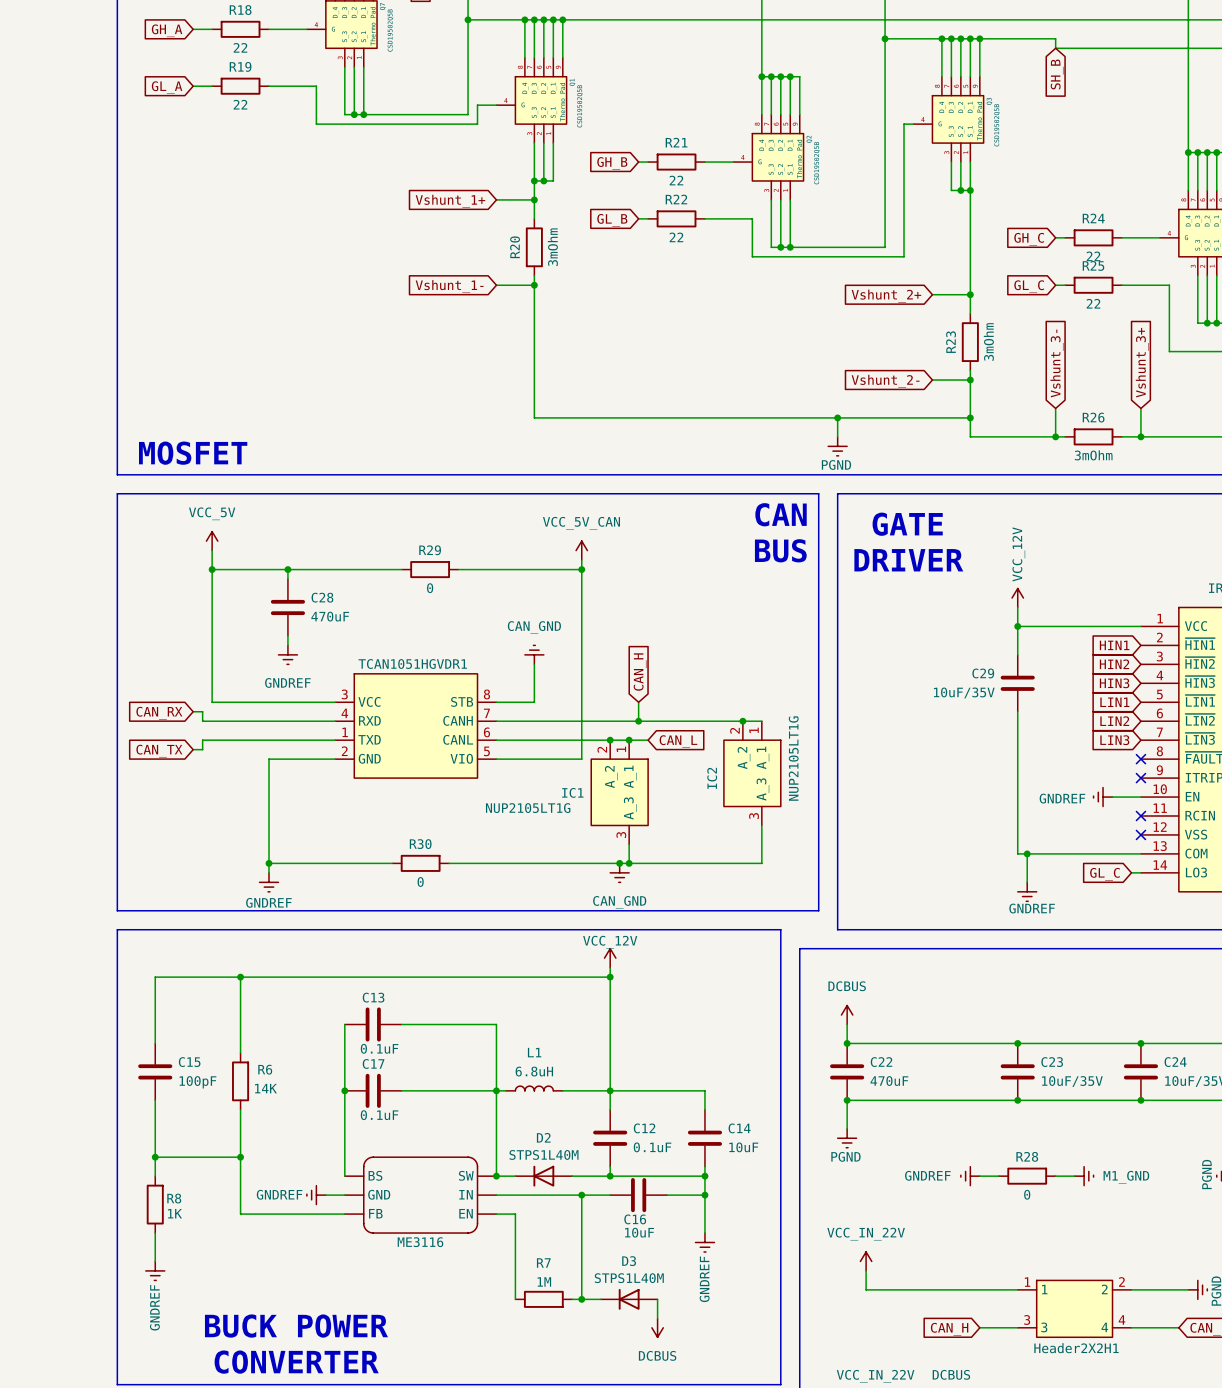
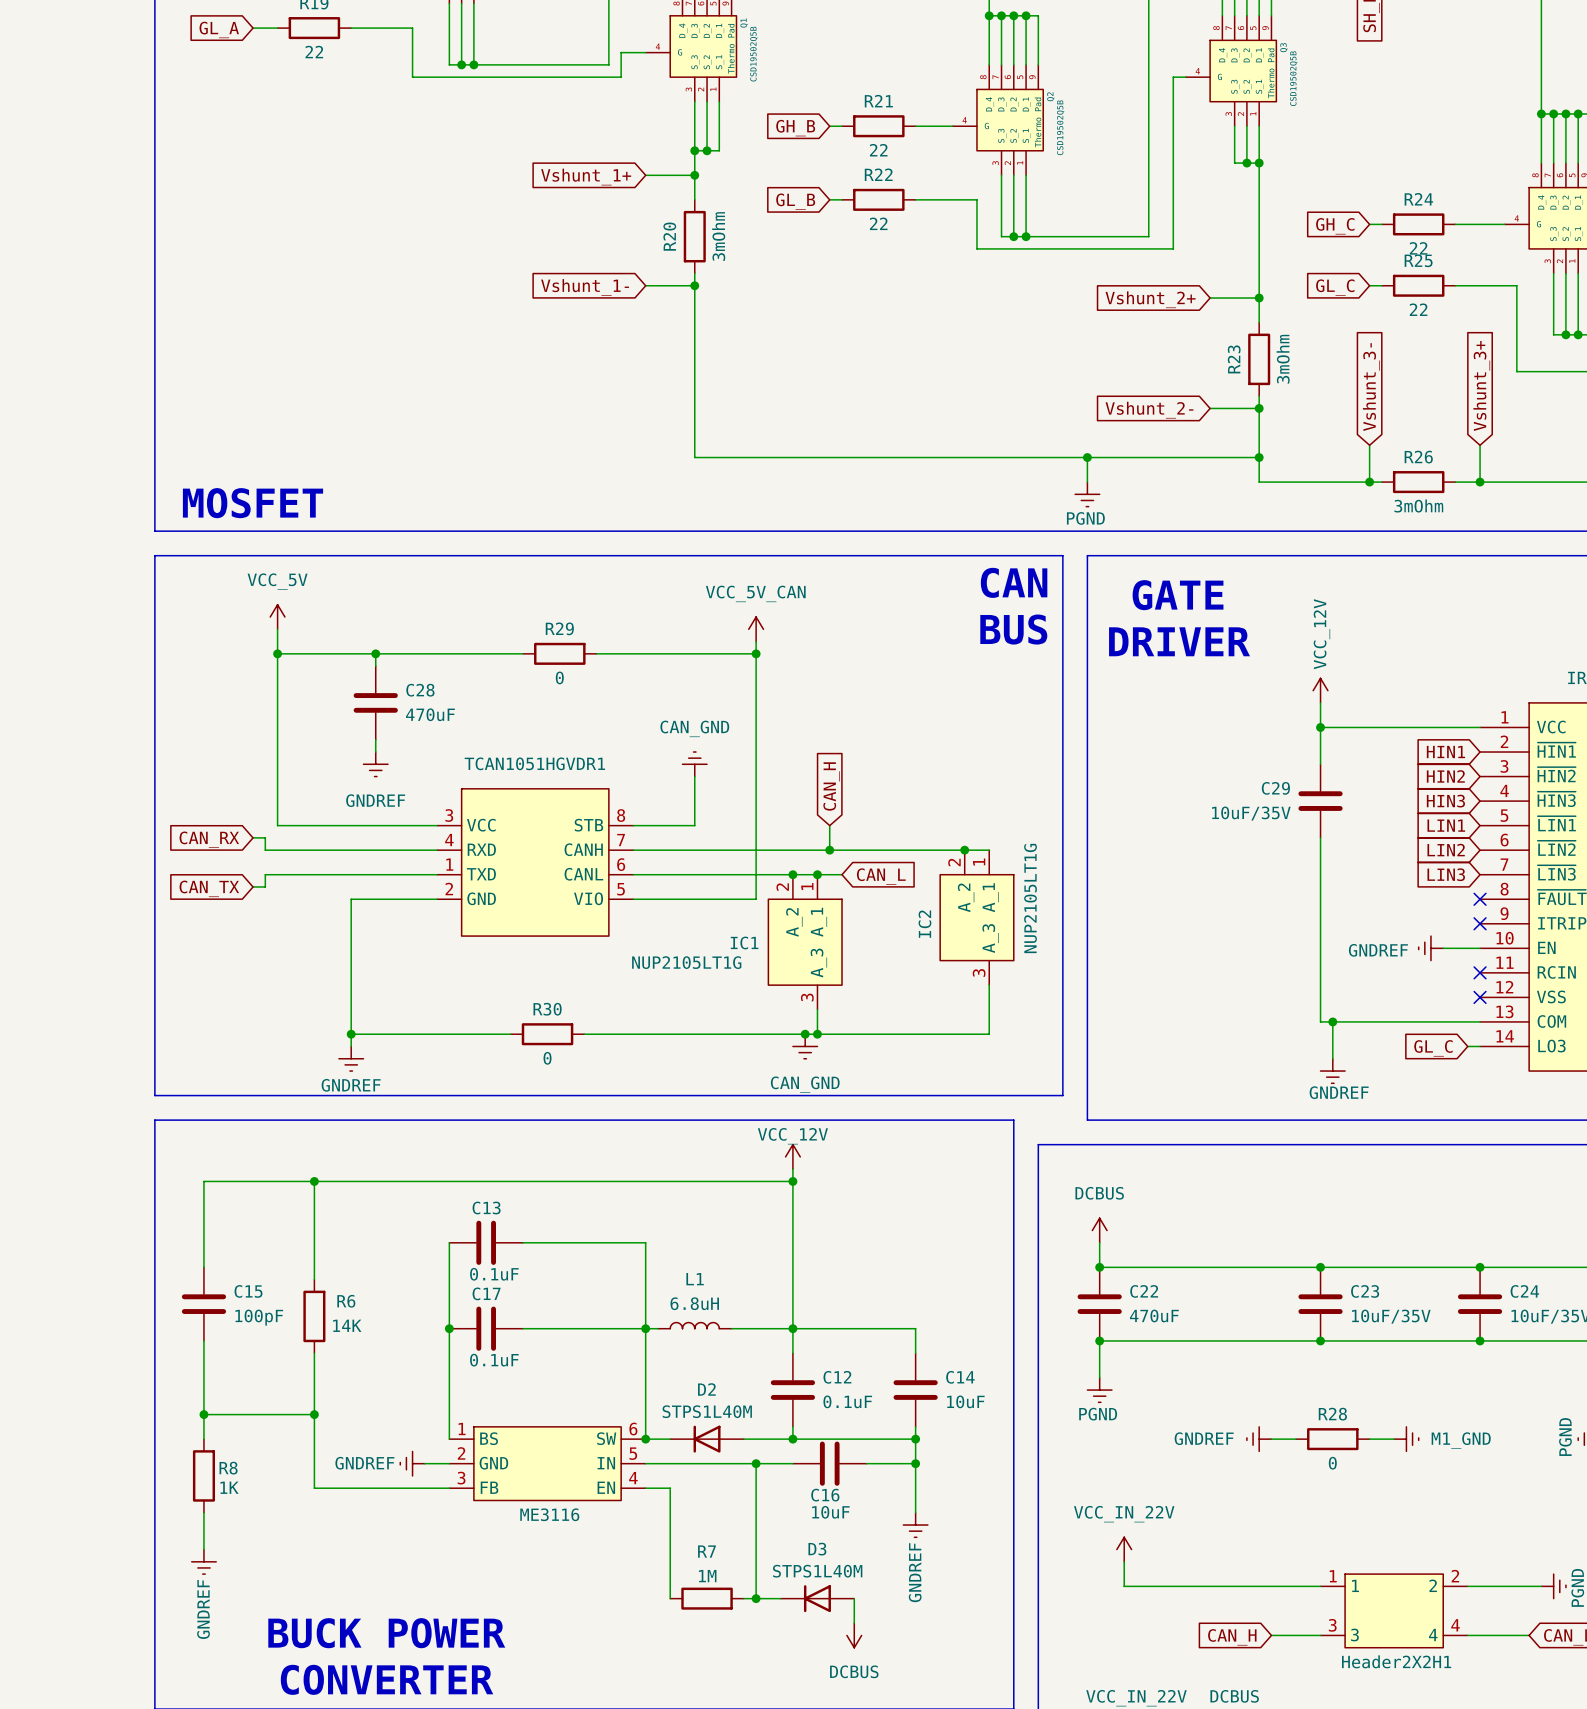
TCAN1051HGVDR1 symbol: [335, 673, 497, 779] -> [437, 788, 634, 937]
ME3116 symbol: [344, 1157, 497, 1234] -> [449, 1426, 646, 1501]

